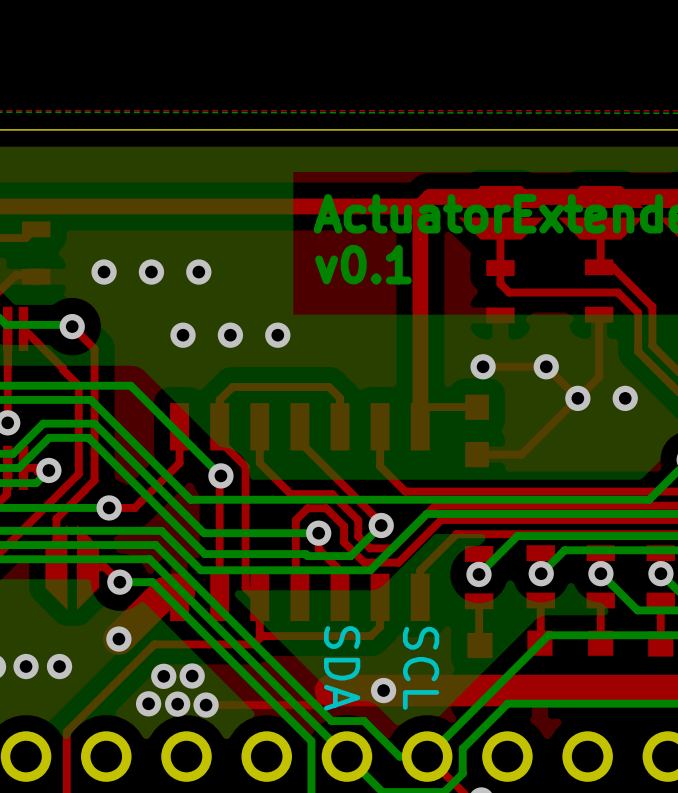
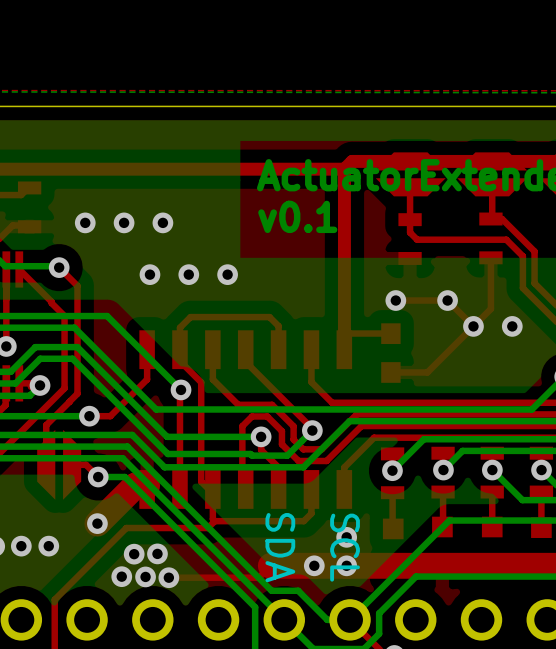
via: none -> (346, 537)
via: none -> (346, 565)

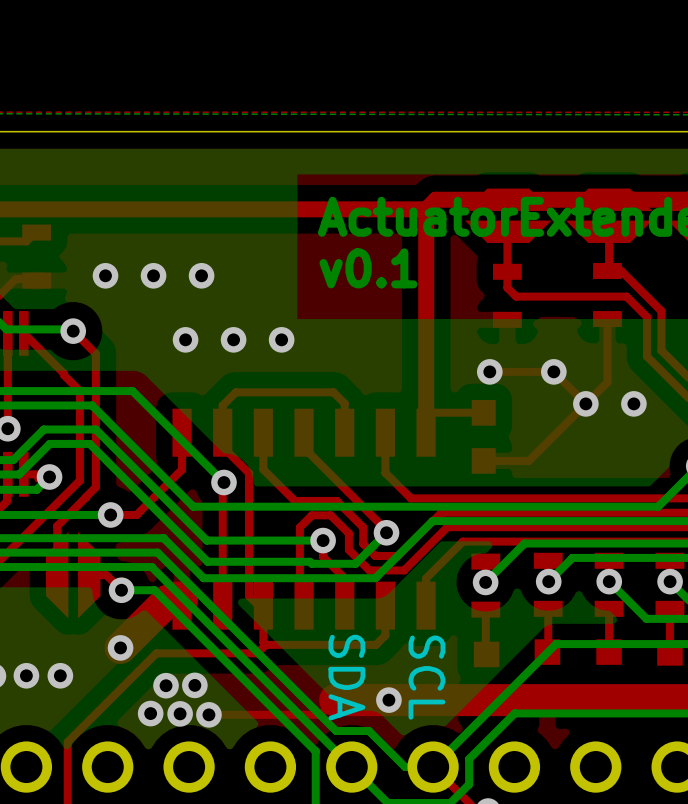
via: (346, 537) -> none
via: (346, 565) -> none

